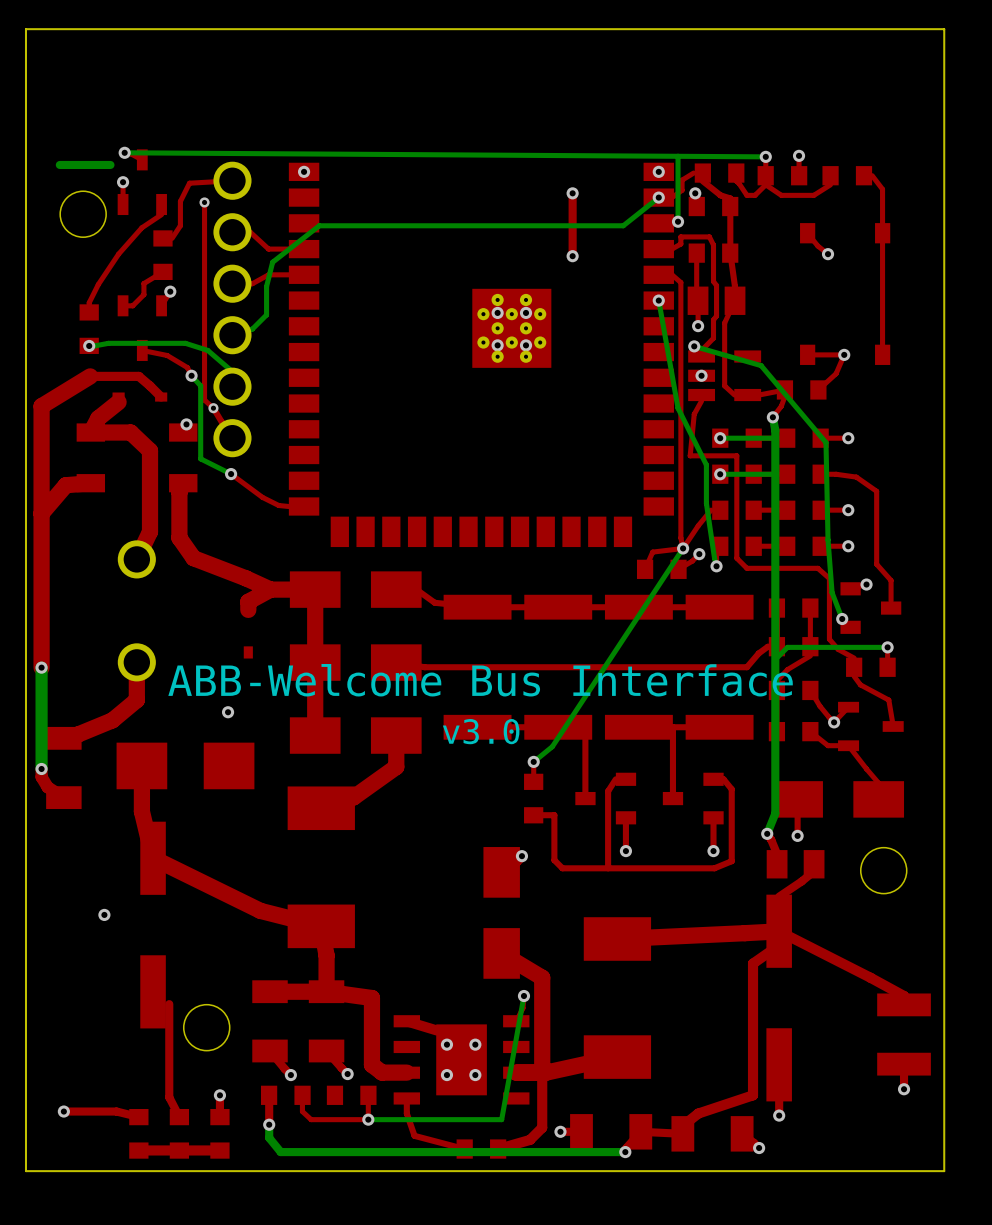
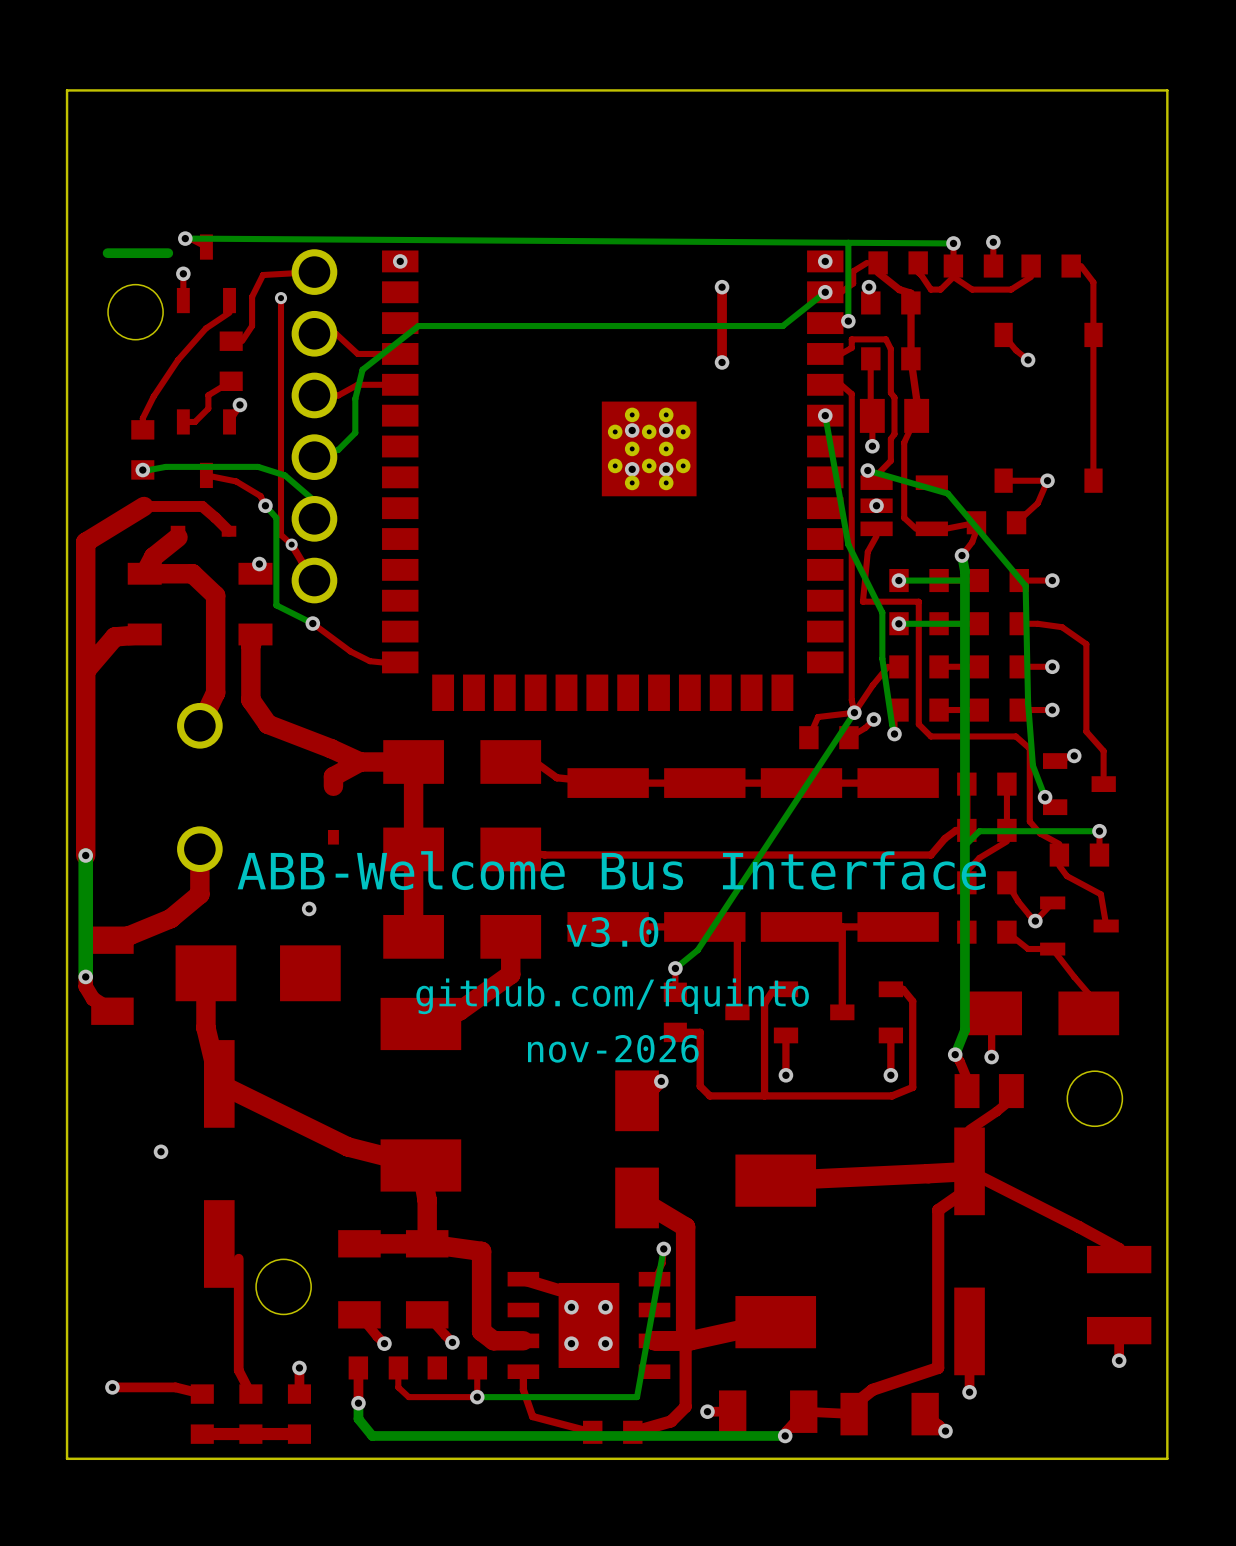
text: none -> github.com/fquinto (612, 996)
text: none -> nov-2026 (613, 1048)

